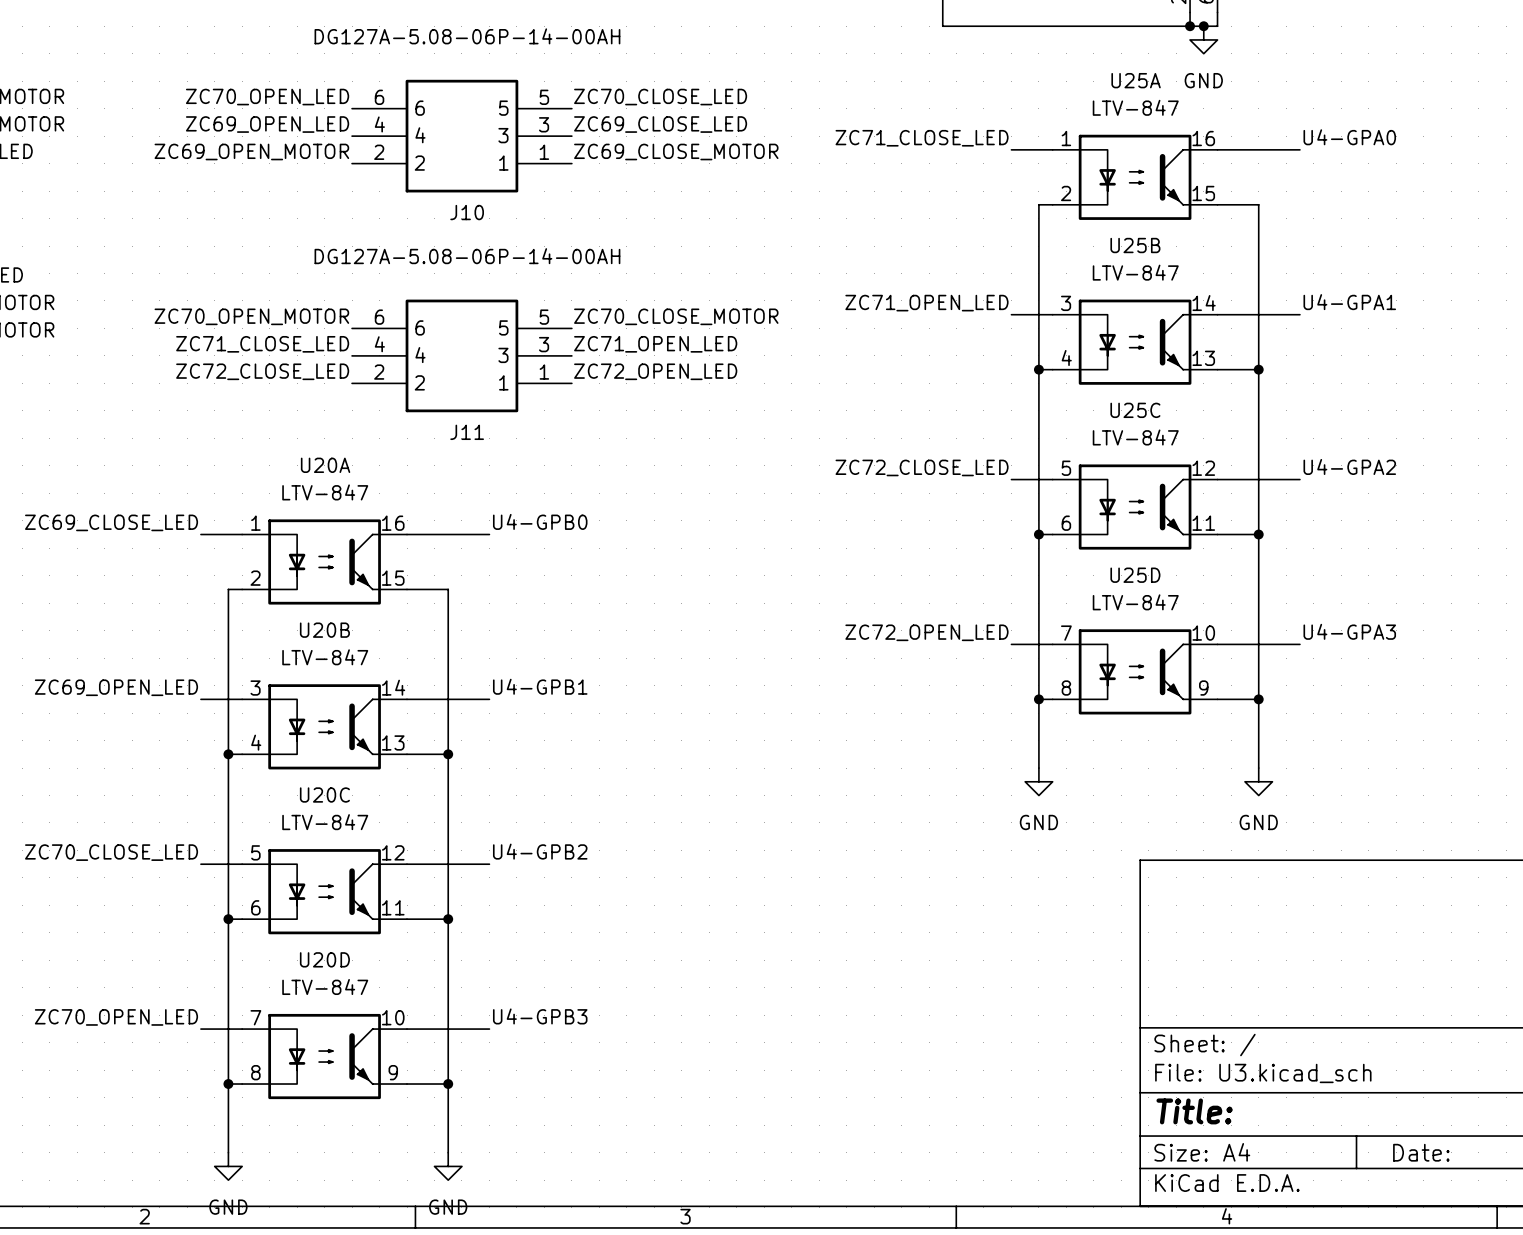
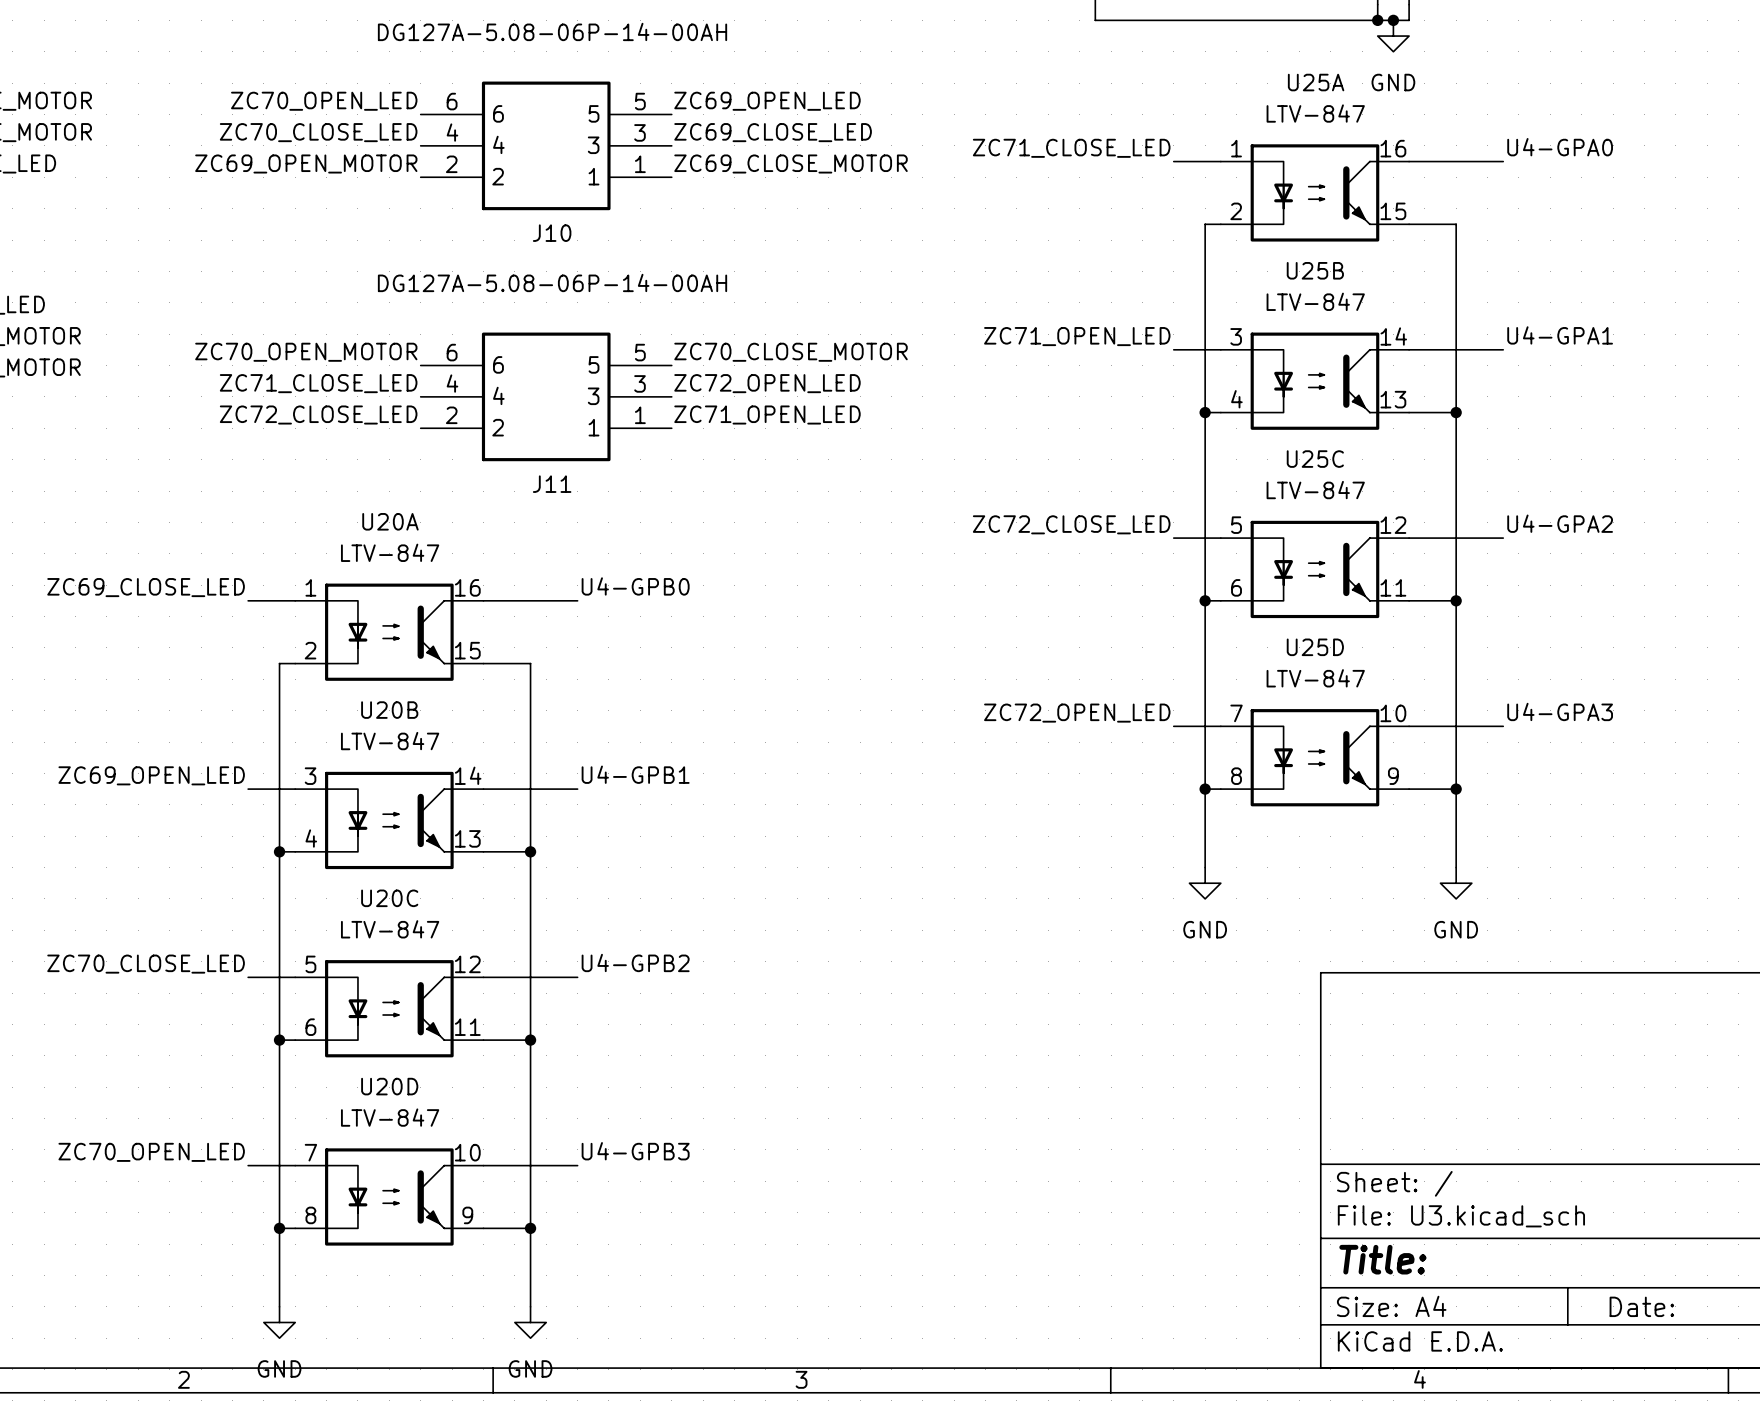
label: ZC70_CLOSE_LED (660, 97) -> ZC69_OPEN_LED (767, 101)
label: ZC69_OPEN_LED (267, 124) -> ZC70_CLOSE_LED (318, 132)
label: ZC71_OPEN_LED (655, 344) -> ZC72_OPEN_LED (767, 383)
label: ZC72_OPEN_LED (655, 371) -> ZC71_OPEN_LED (767, 415)

